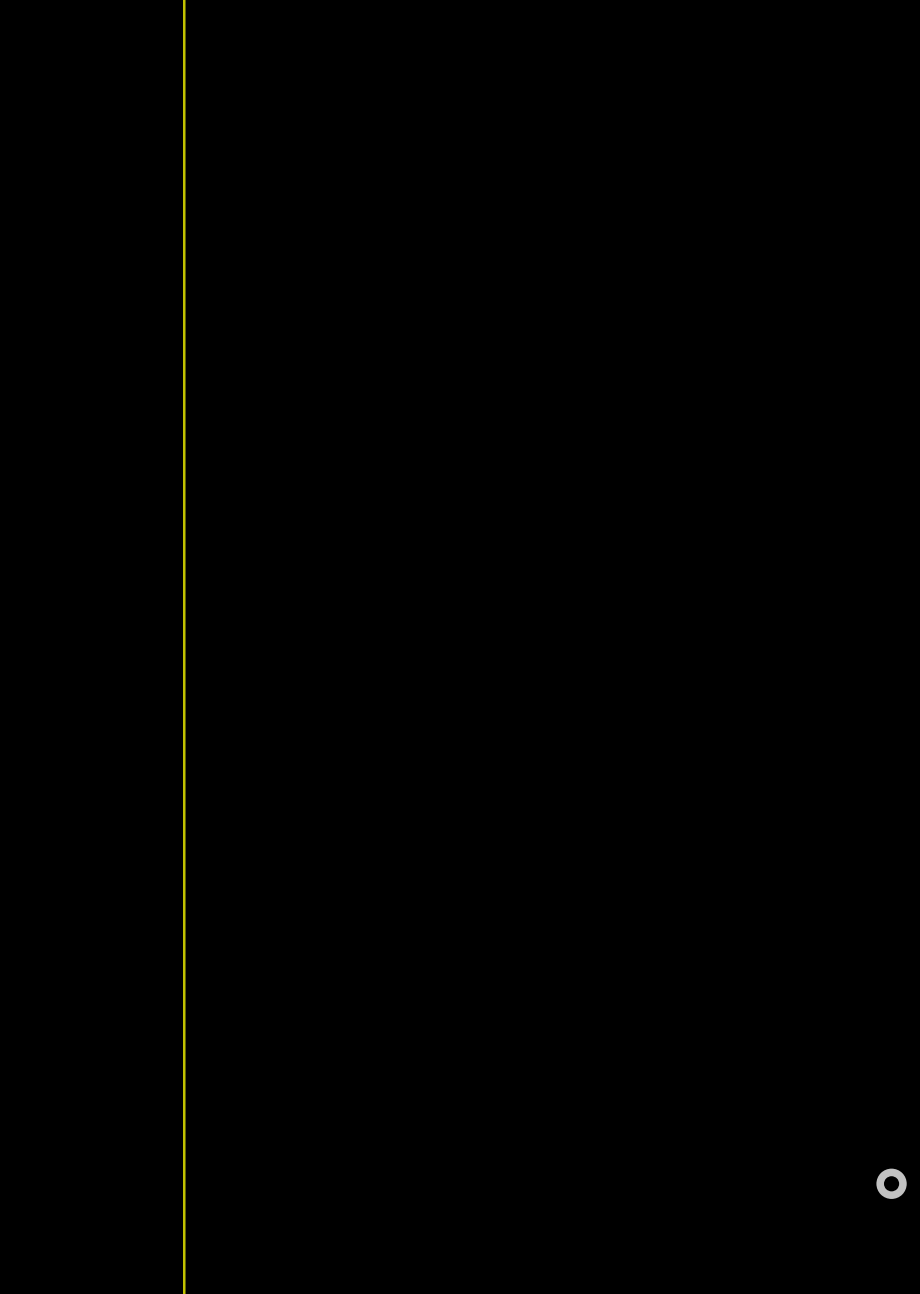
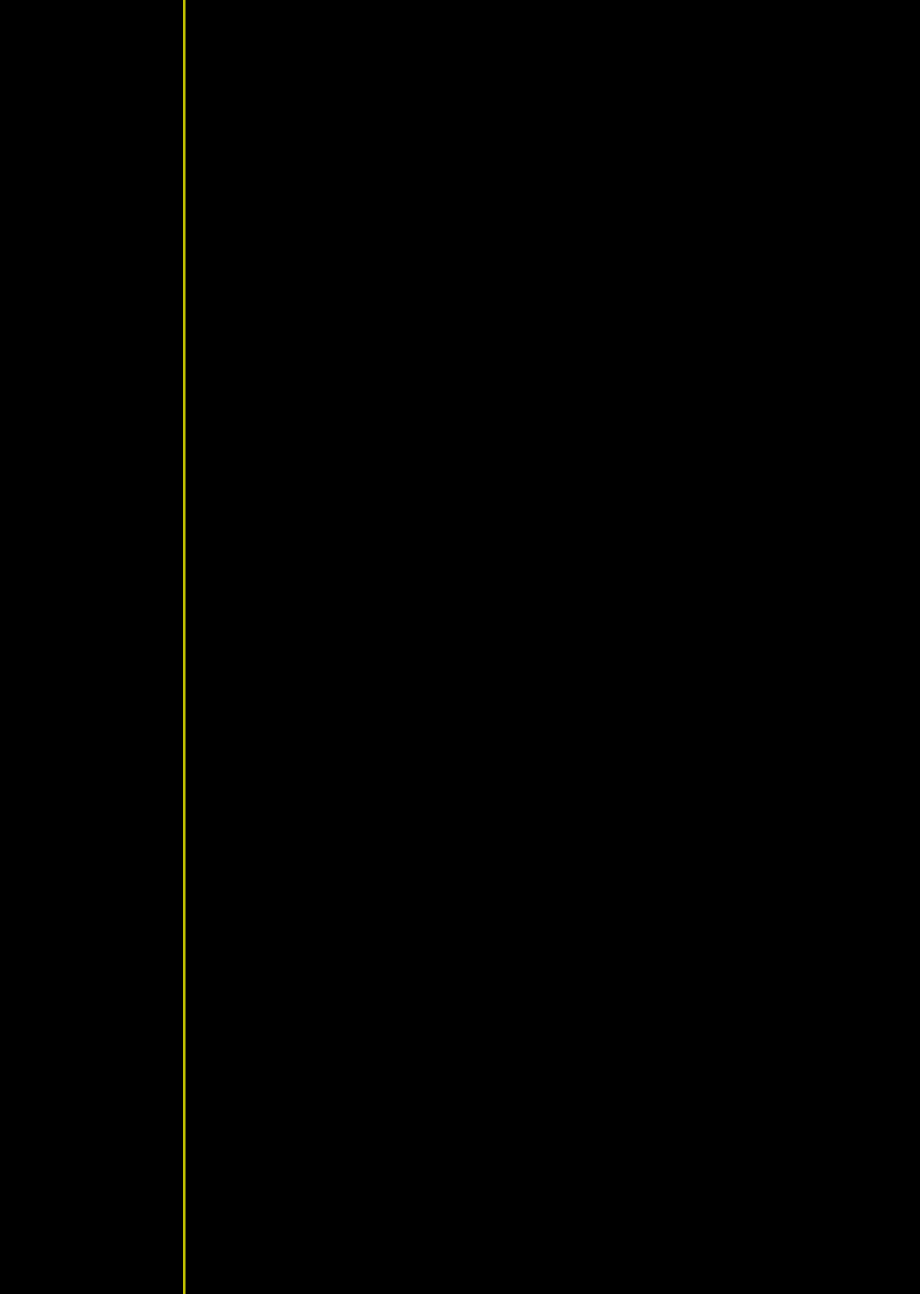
via: (891, 1183) -> none

